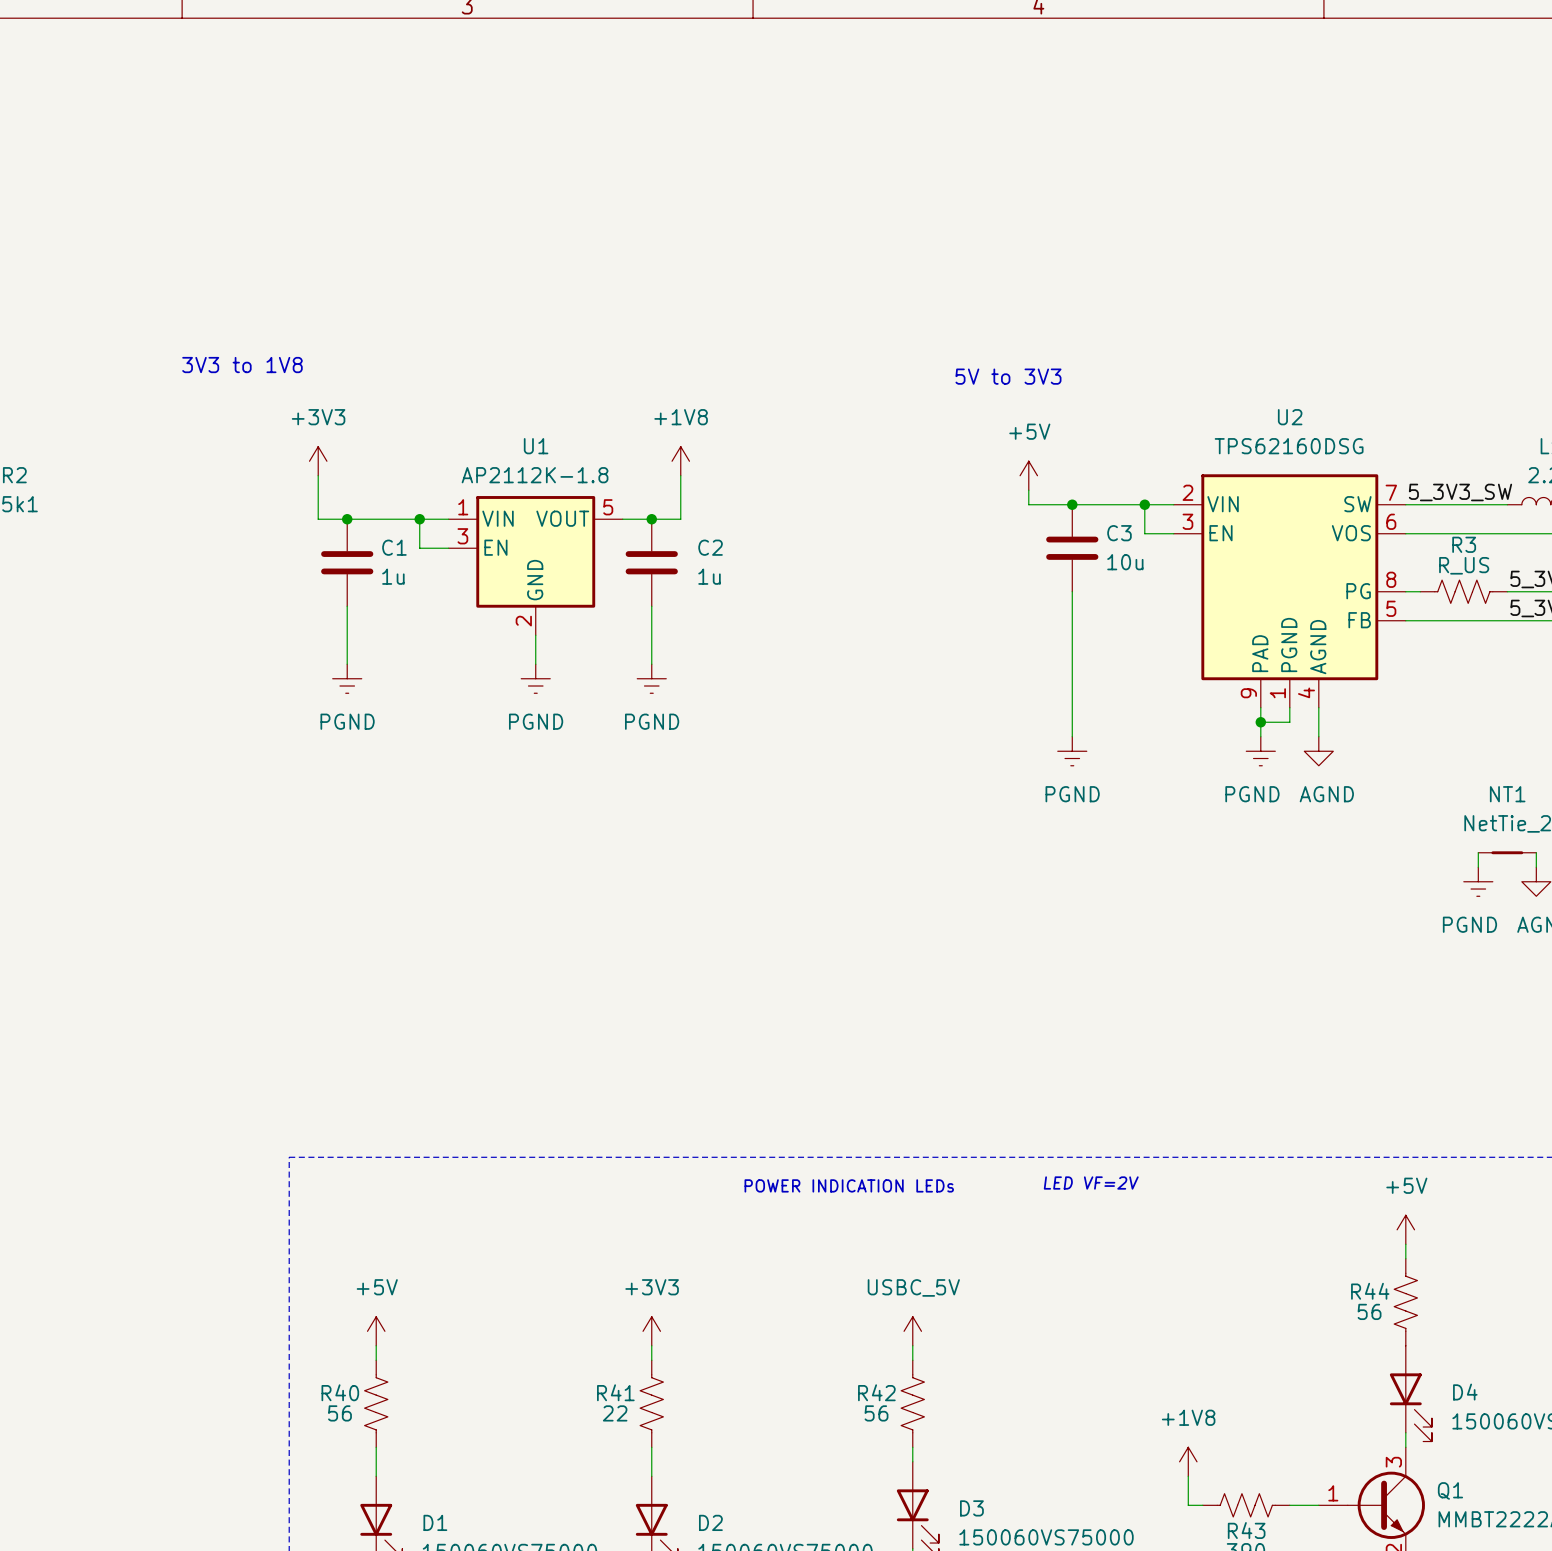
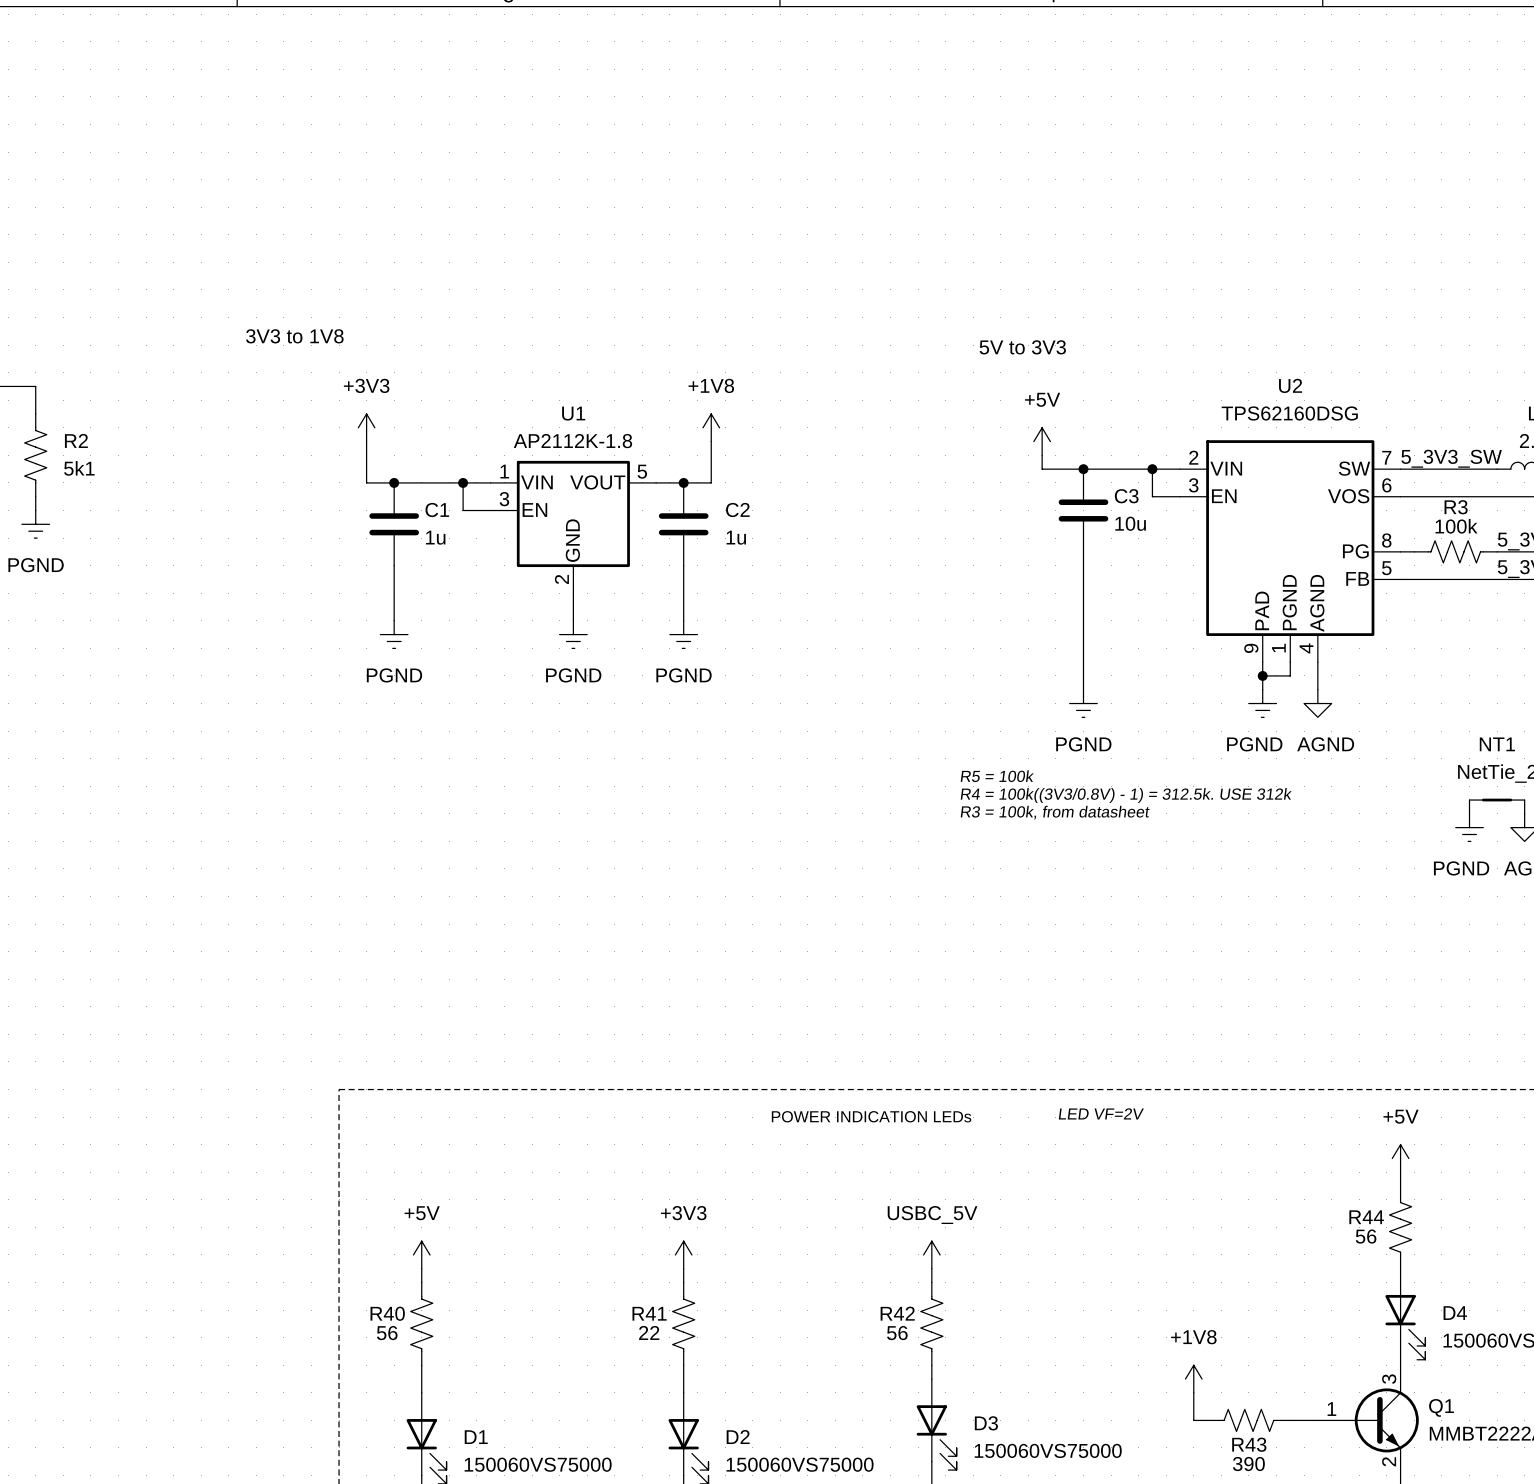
R3 value: R_US (1464, 565) -> 100k (1456, 526)
text: none -> R5 = 100k (997, 776)
text: none -> R4 = 100k((3V3/0.8V) - 1) = 312.5k. USE 312k (1126, 795)
text: none -> R3 = 100k, from datasheet (1055, 812)

